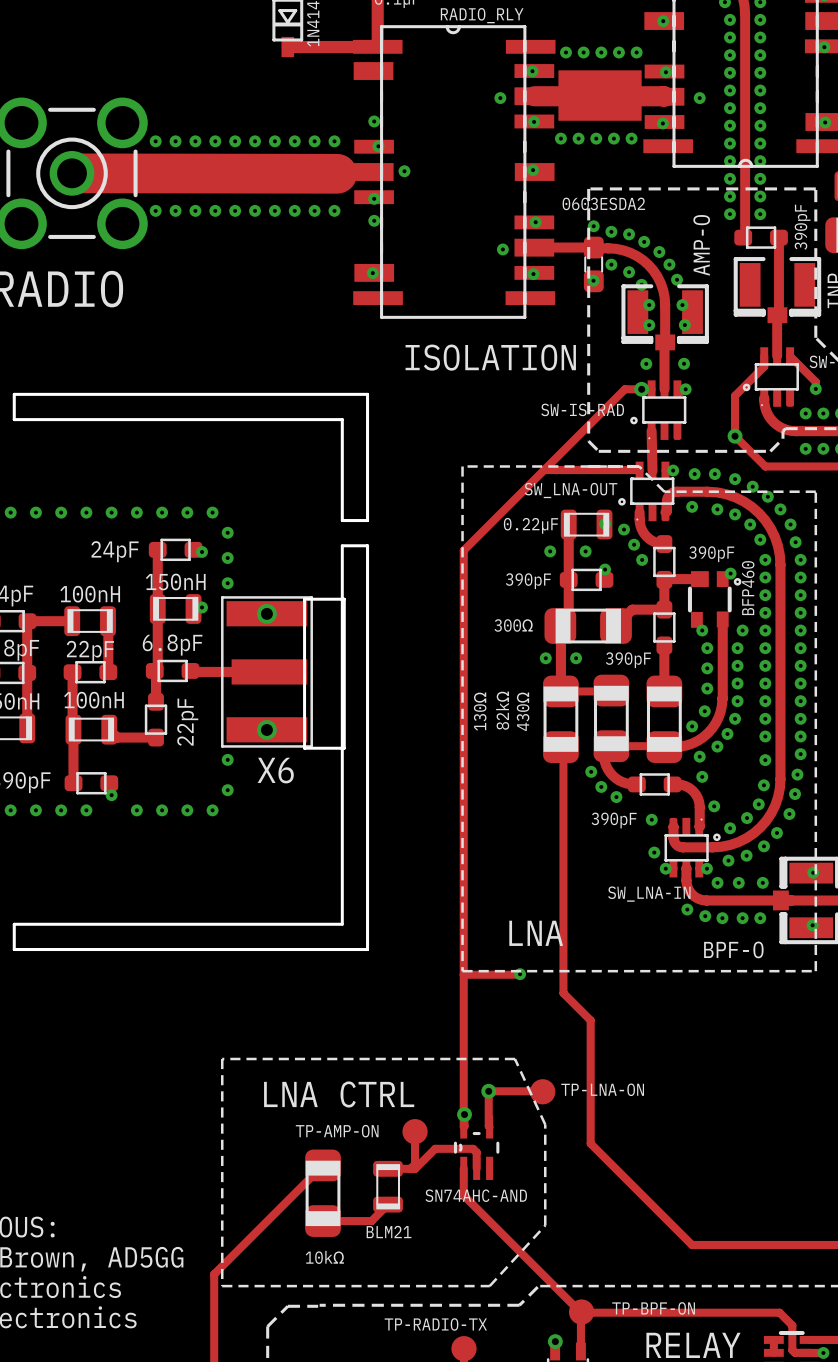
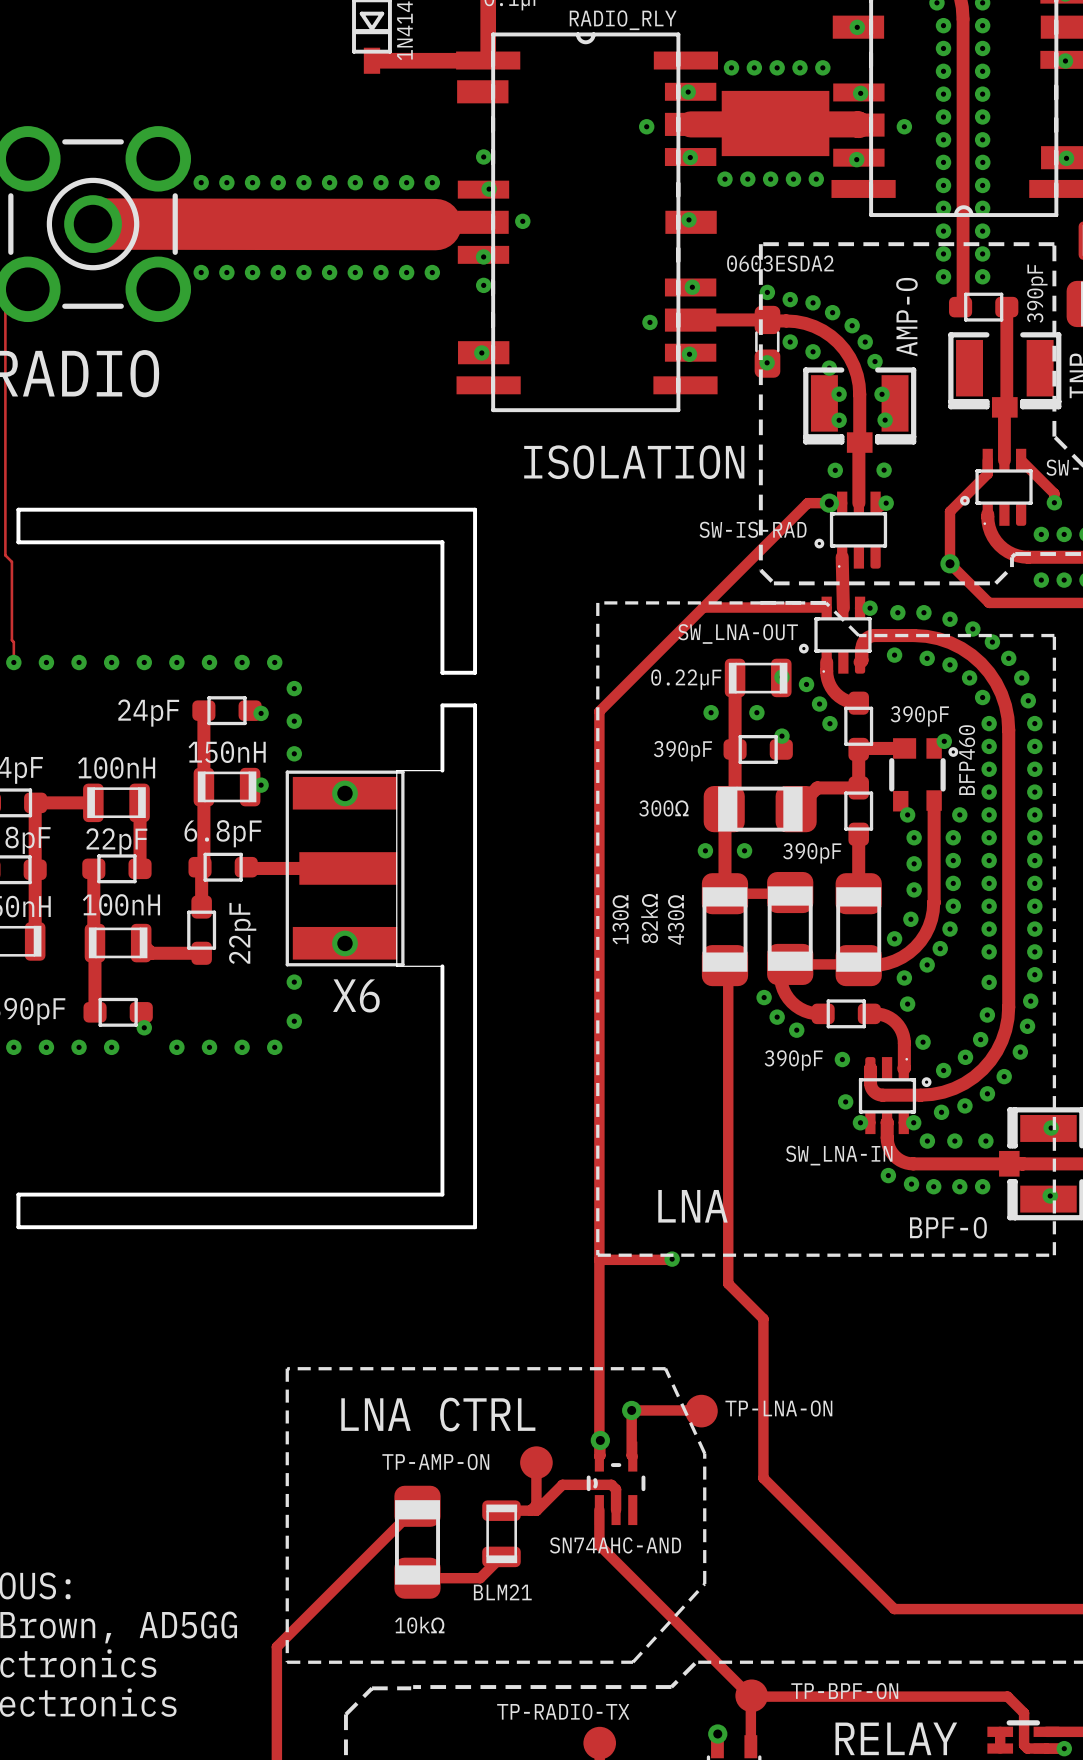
track: none -> (27, 289) (5, 311) (5, 555) (11, 561) (13, 662)
board edge: (342, 596) (342, 747) -> (442, 770) (396, 770) (396, 966) (442, 966)
board edge: (304, 599) (304, 748) (344, 748) (344, 599) (304, 599) -> none

